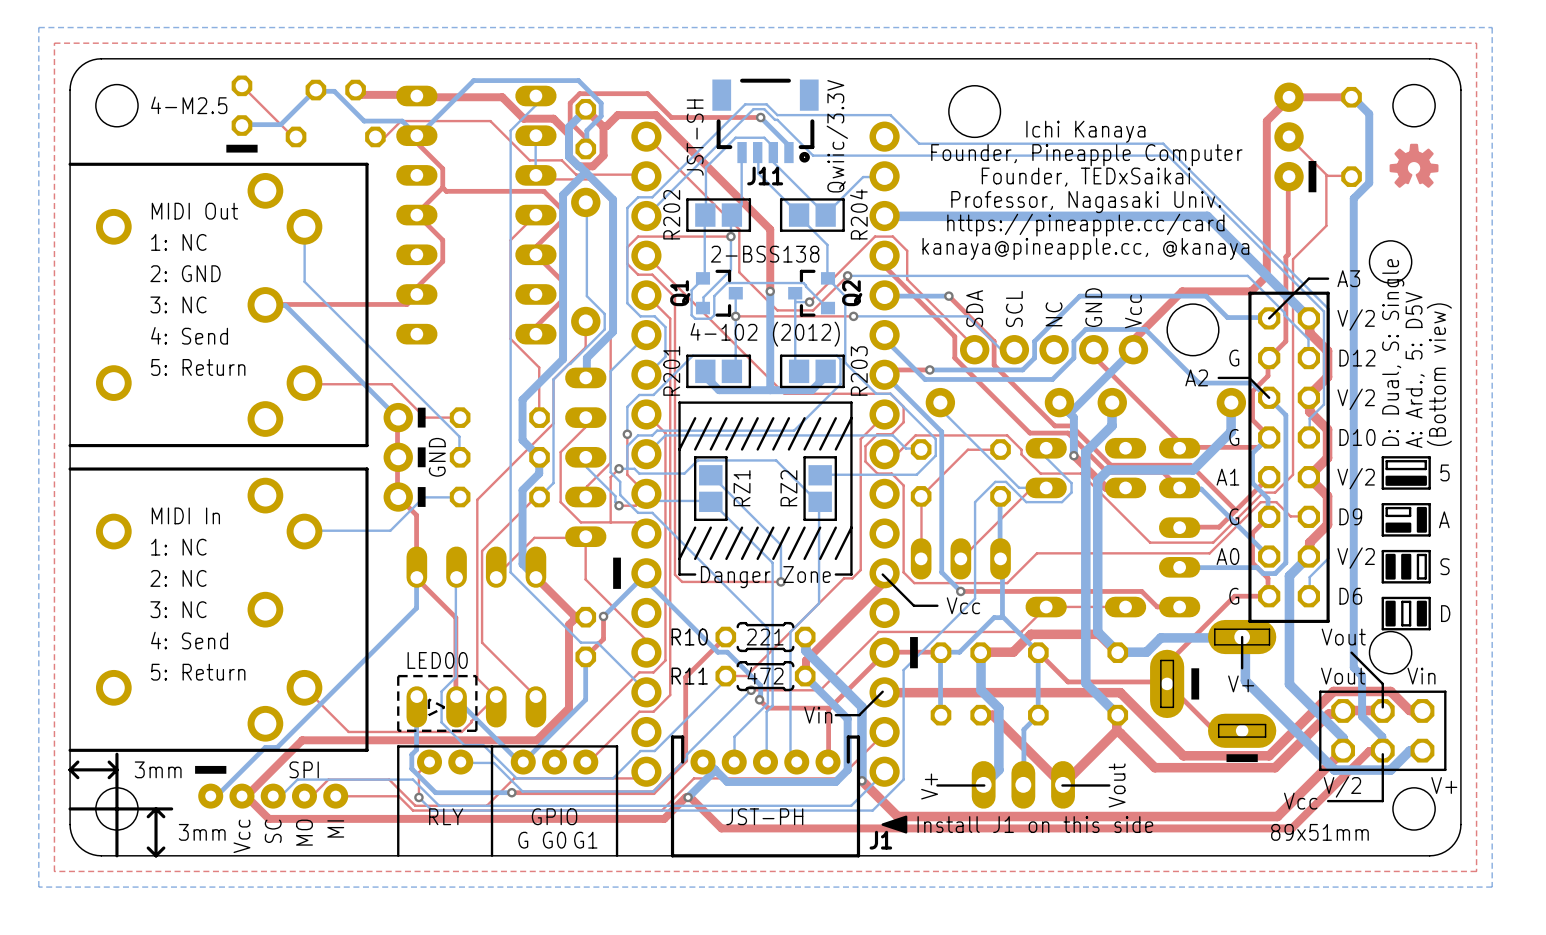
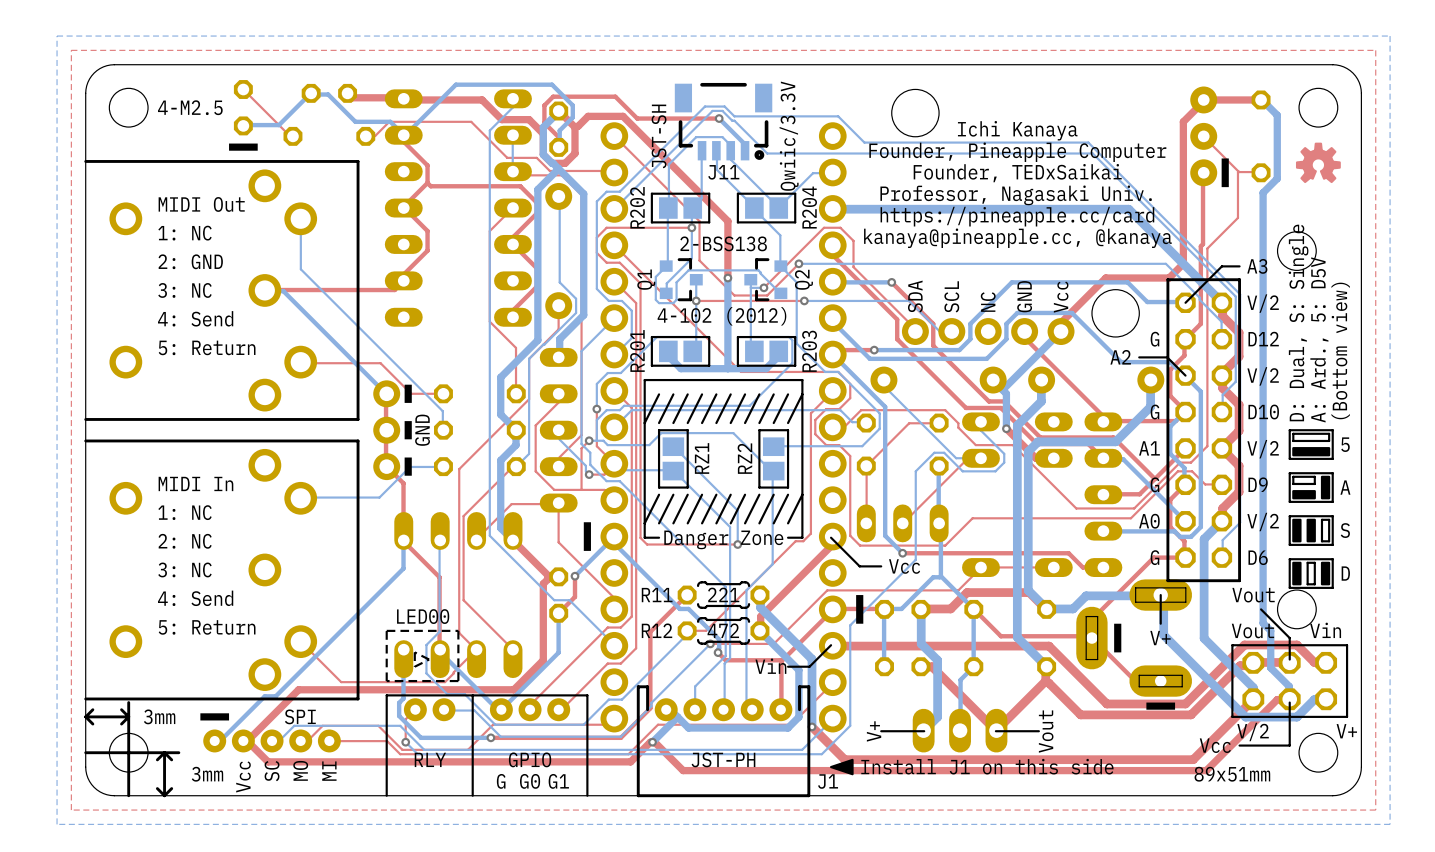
R10 name: R10 (689, 637) -> R11 (657, 595)
R11 name: R11 (689, 676) -> R12 (657, 630)

